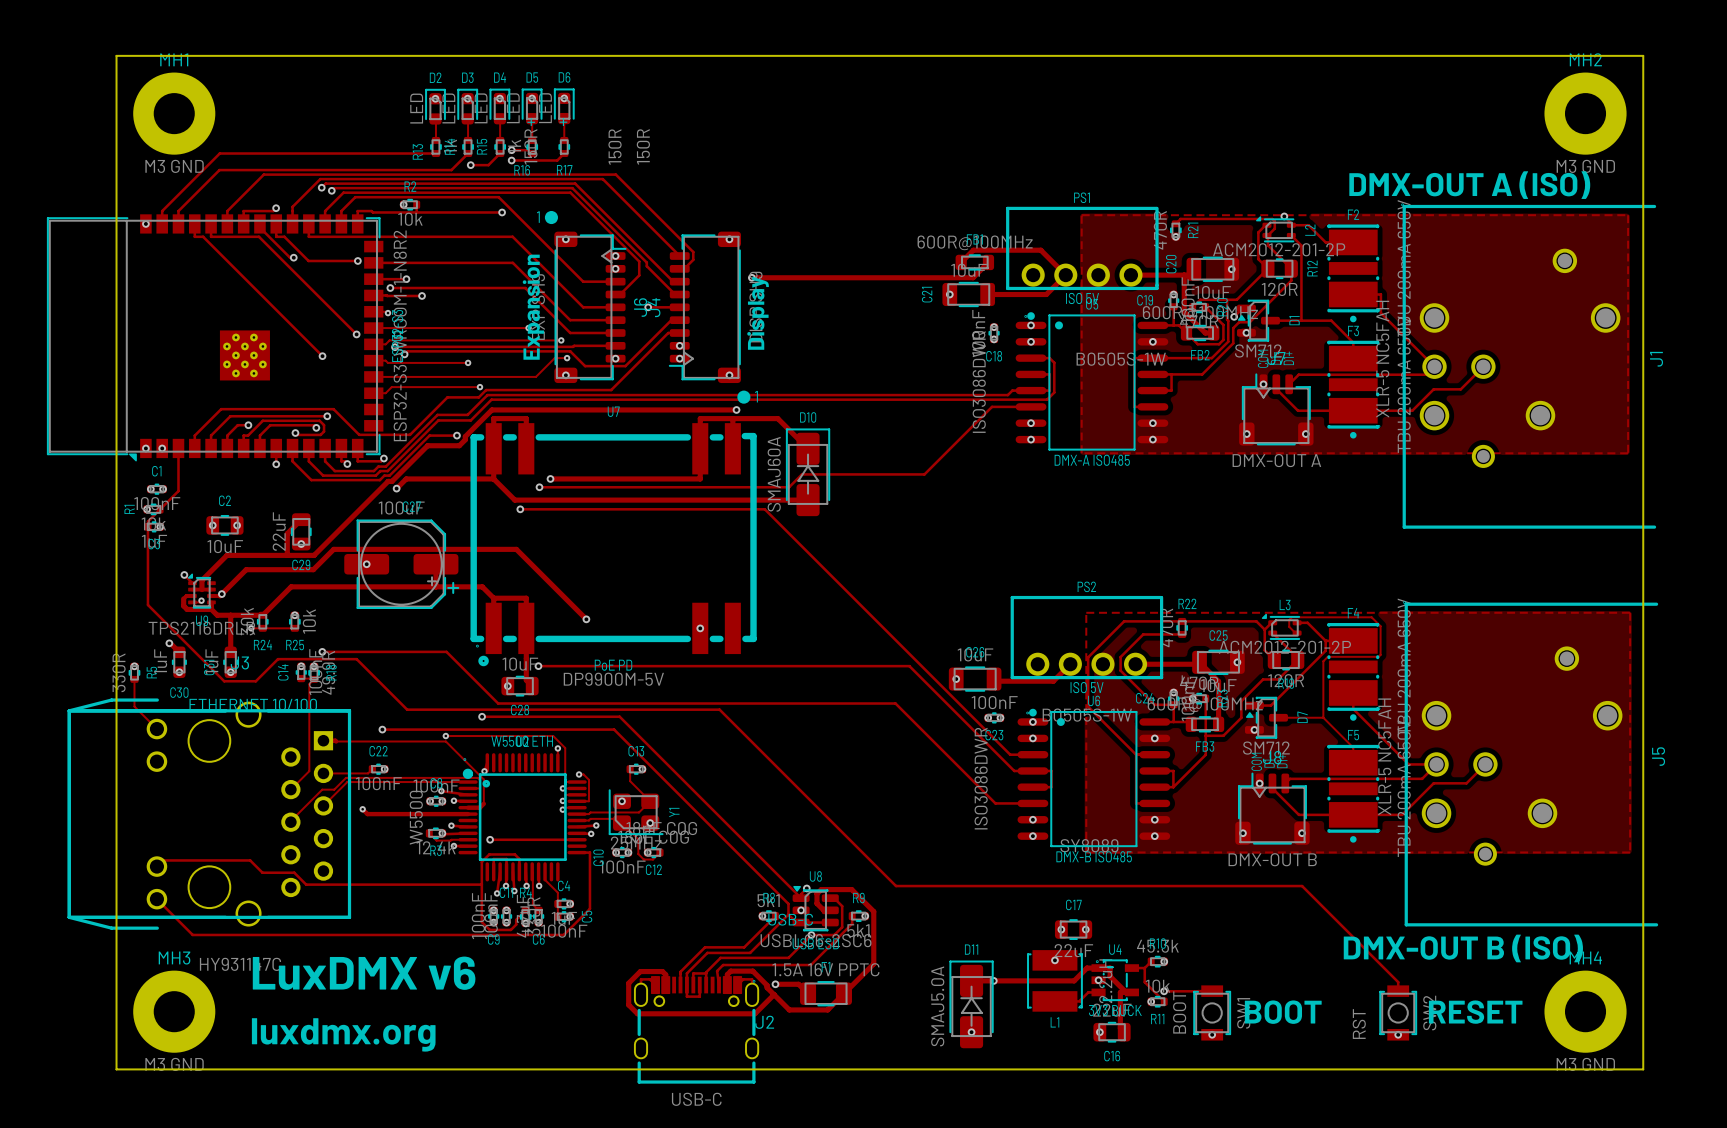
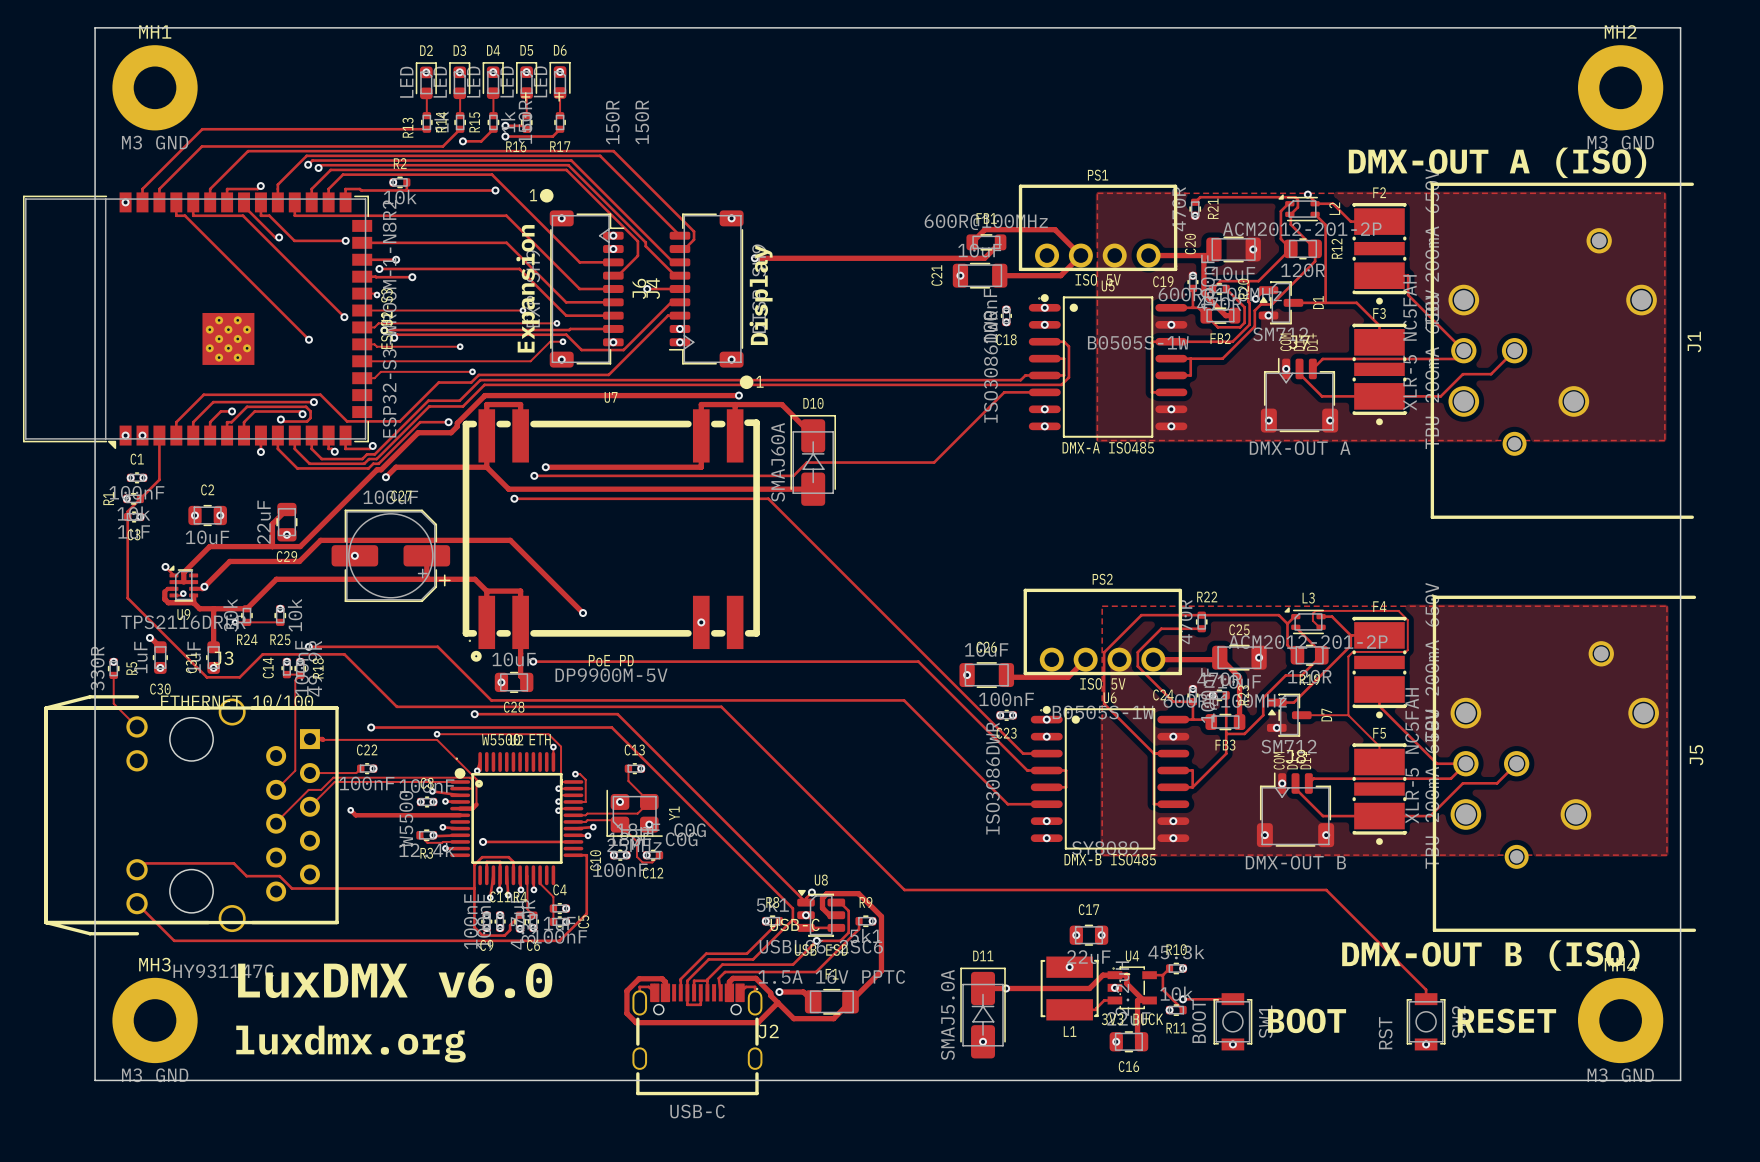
text: LuxDMX v6 (364, 973) -> LuxDMX v6.0 (395, 980)

